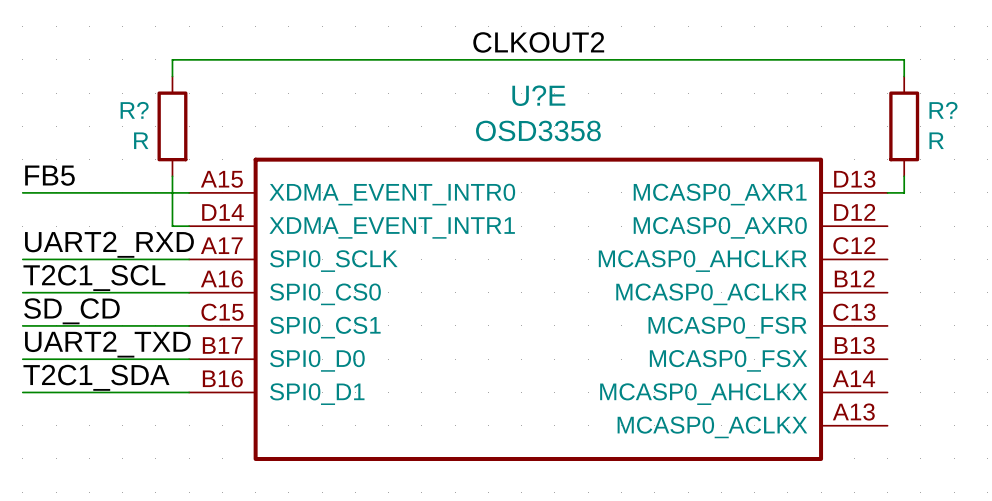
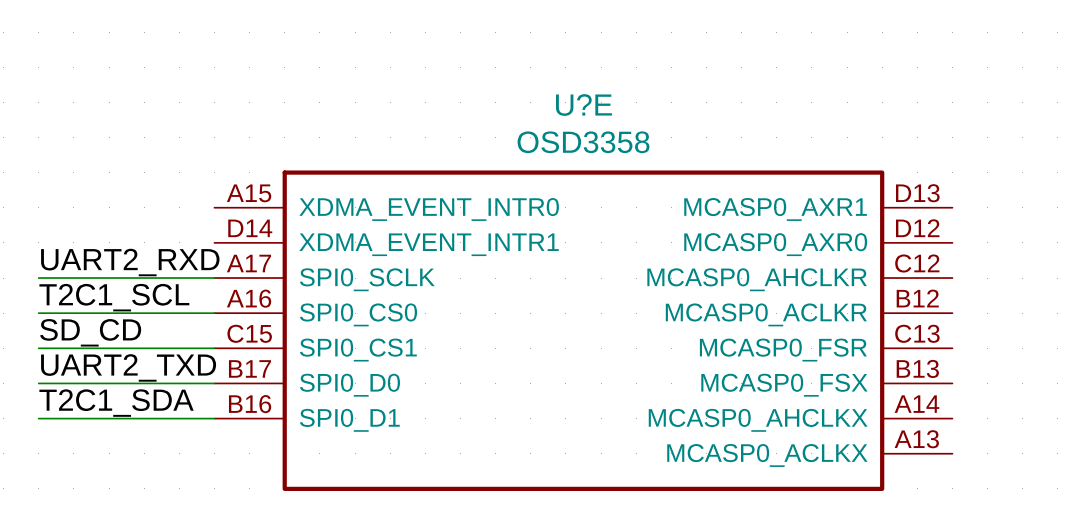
label: CLKOUT2 (538, 42) -> none
wire: (172, 76) (172, 59) (904, 59) (904, 76) -> none
R?: R (172, 126) -> none
R?: R (904, 126) -> none
label: FB5 (49, 175) -> none
wire: (172, 176) (172, 226) (189, 226) -> none
wire: (904, 176) (904, 192) (887, 192) -> none
wire: (22, 192) (189, 192) -> none

